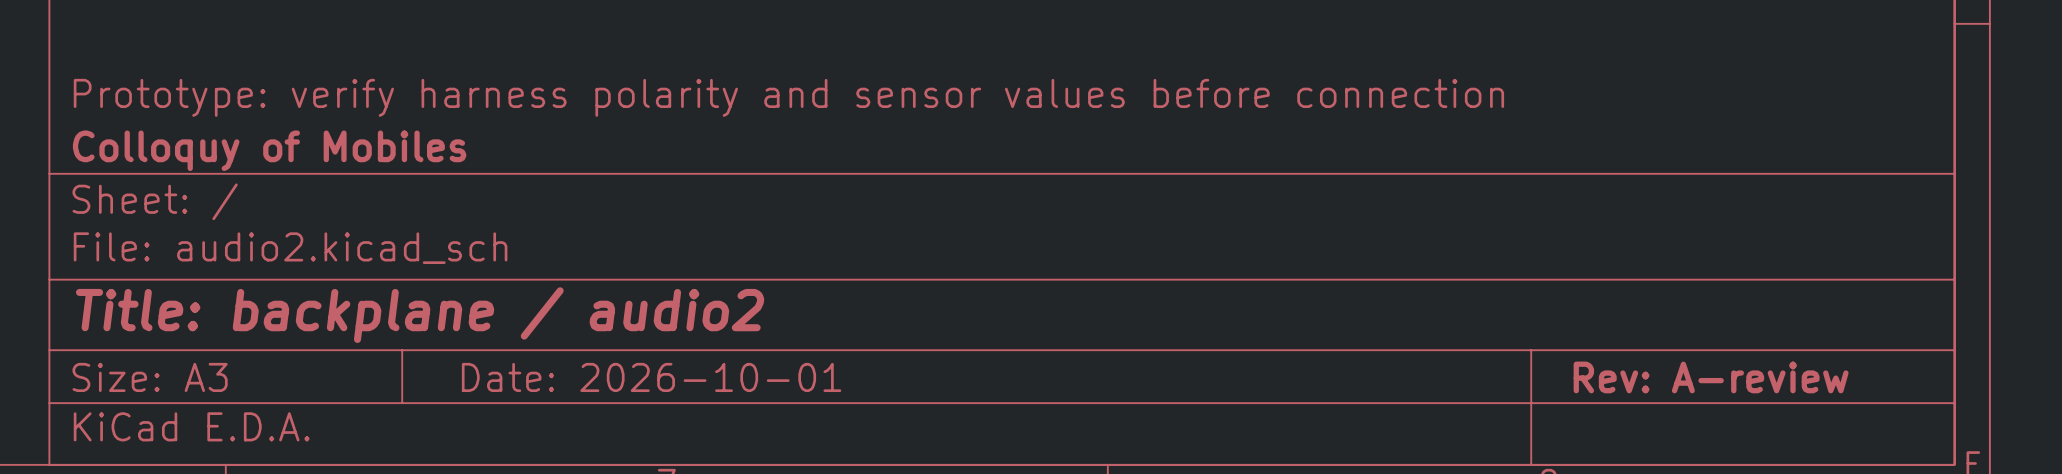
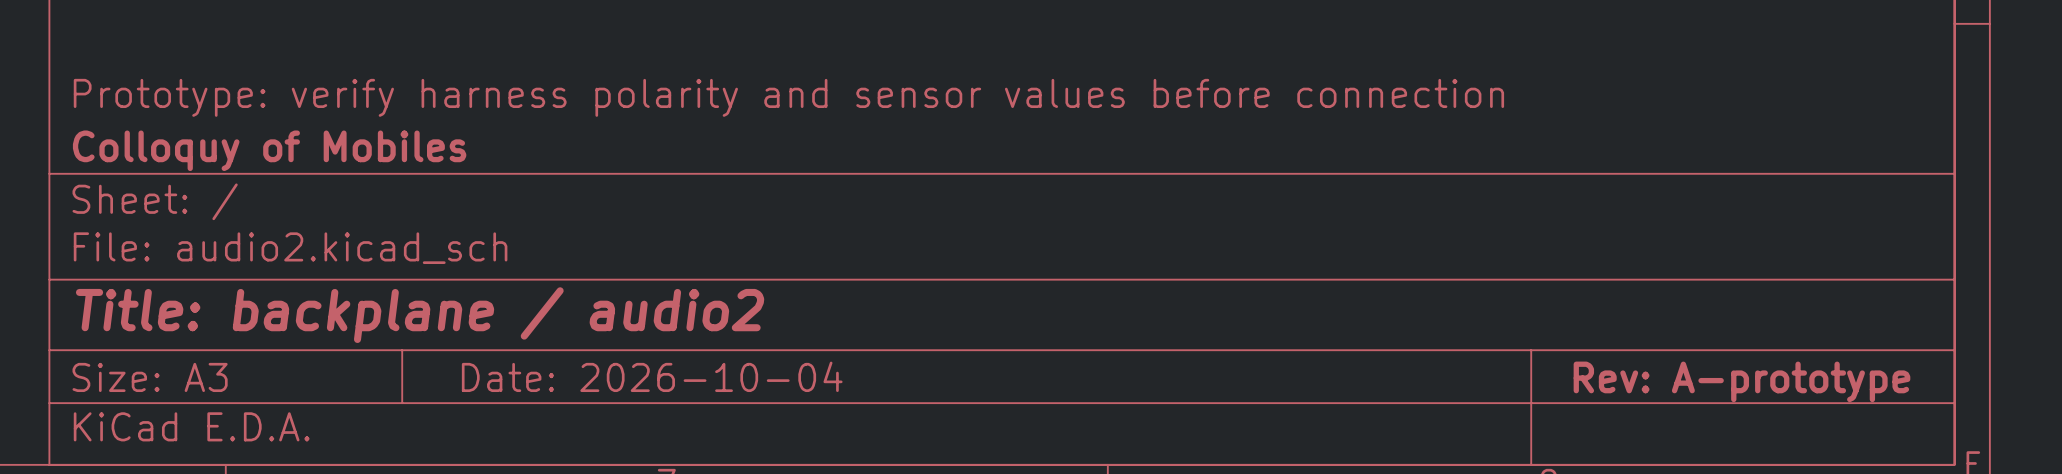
title block: Date: 2026-10-01 (651, 377) -> Date: 2026-10-04 (652, 376)
title block: Rev: A-review (1711, 377) -> Rev: A-prototype (1741, 381)

